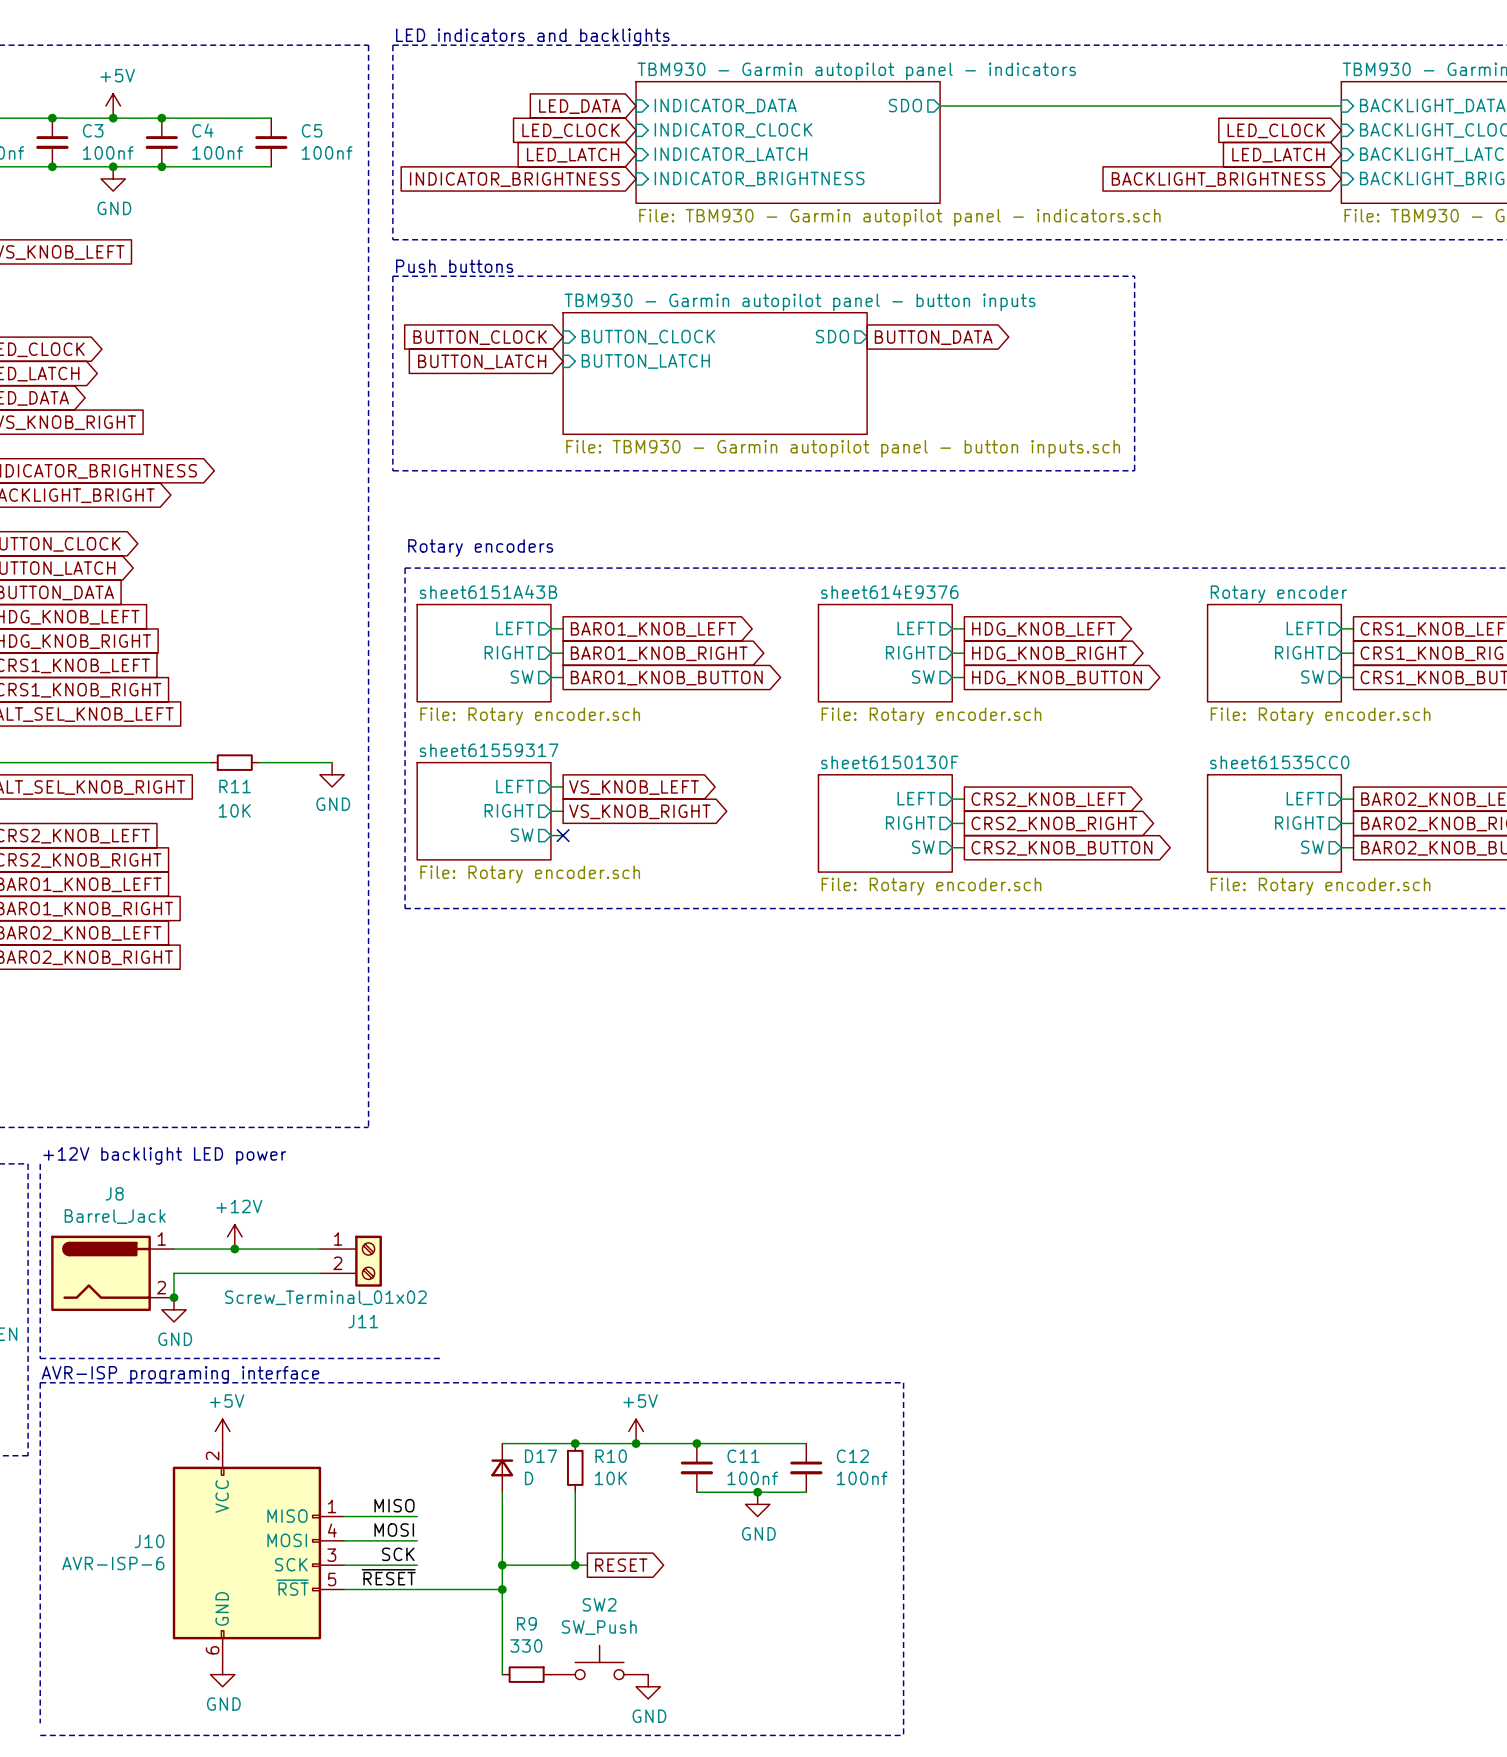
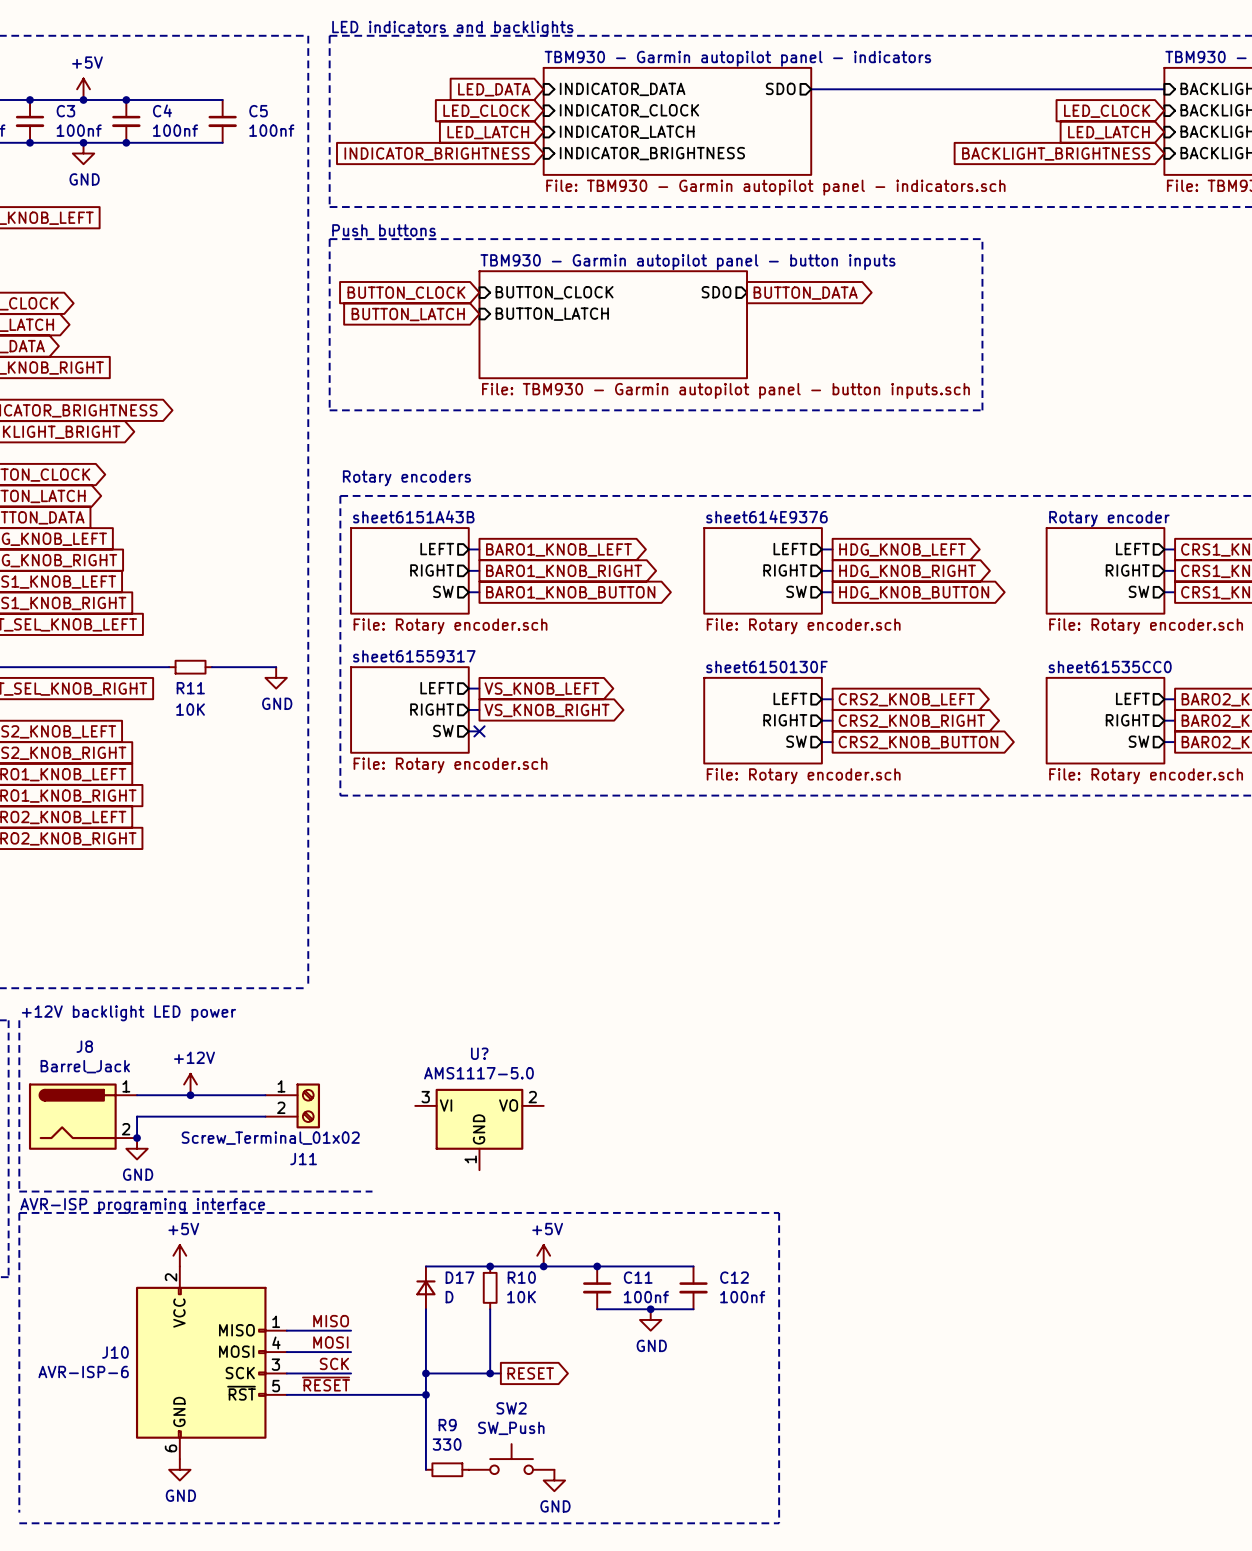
U?: none -> AMS1117-5.0 (479, 1129)

